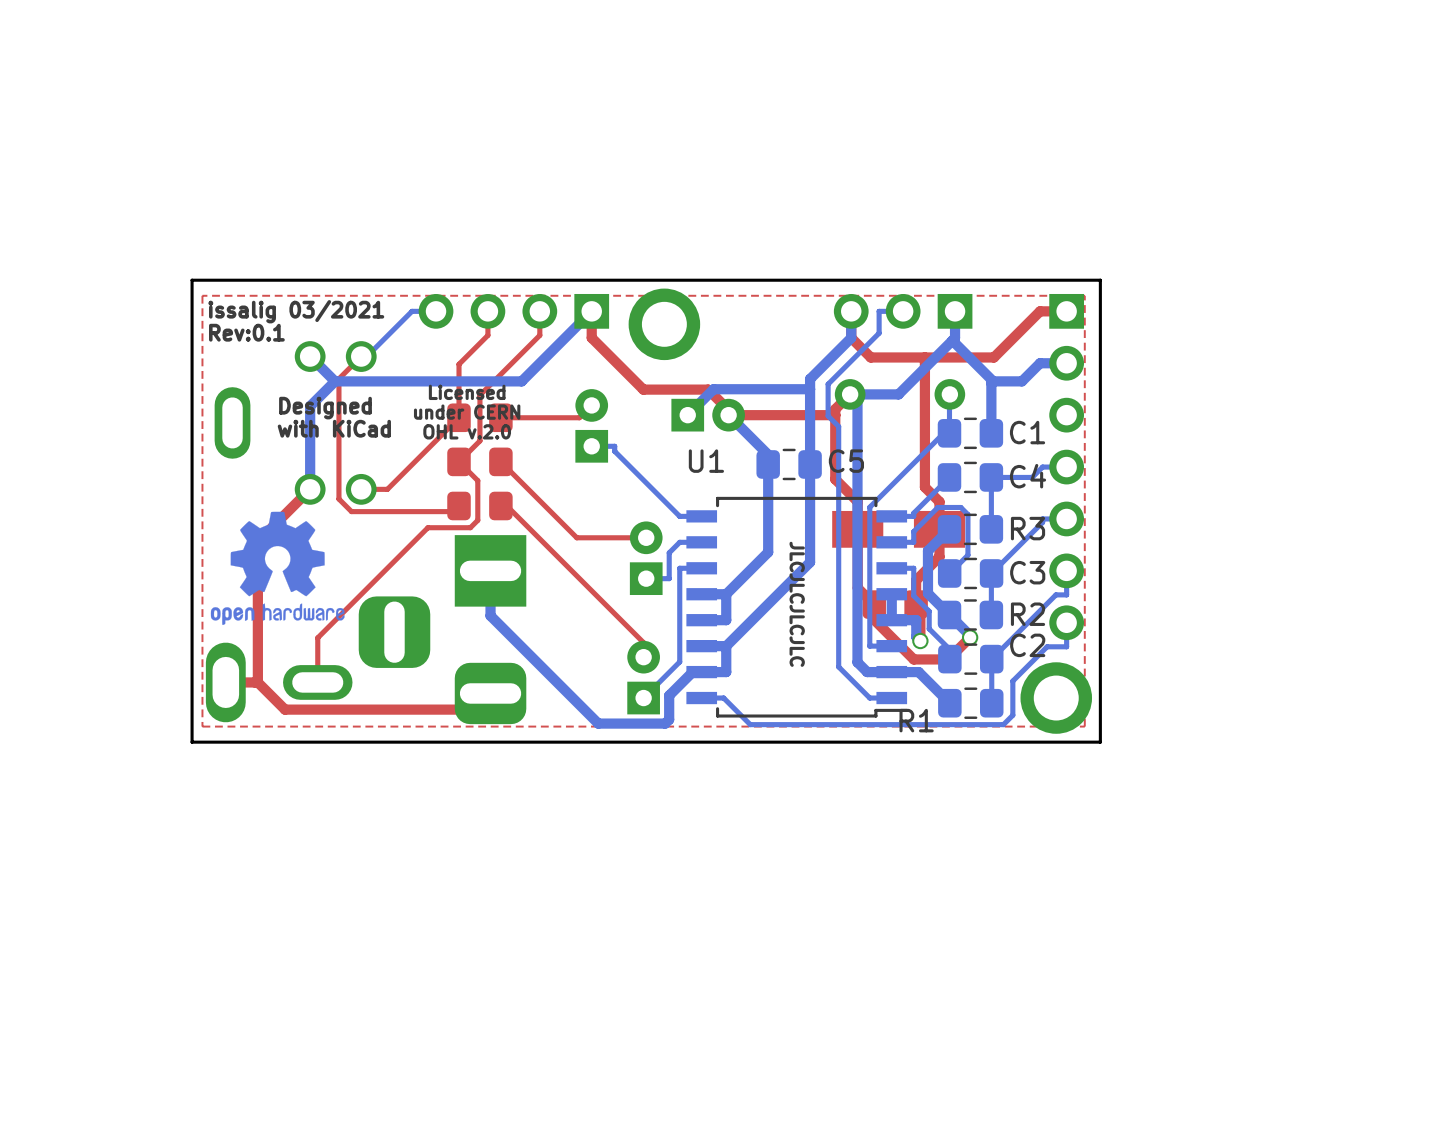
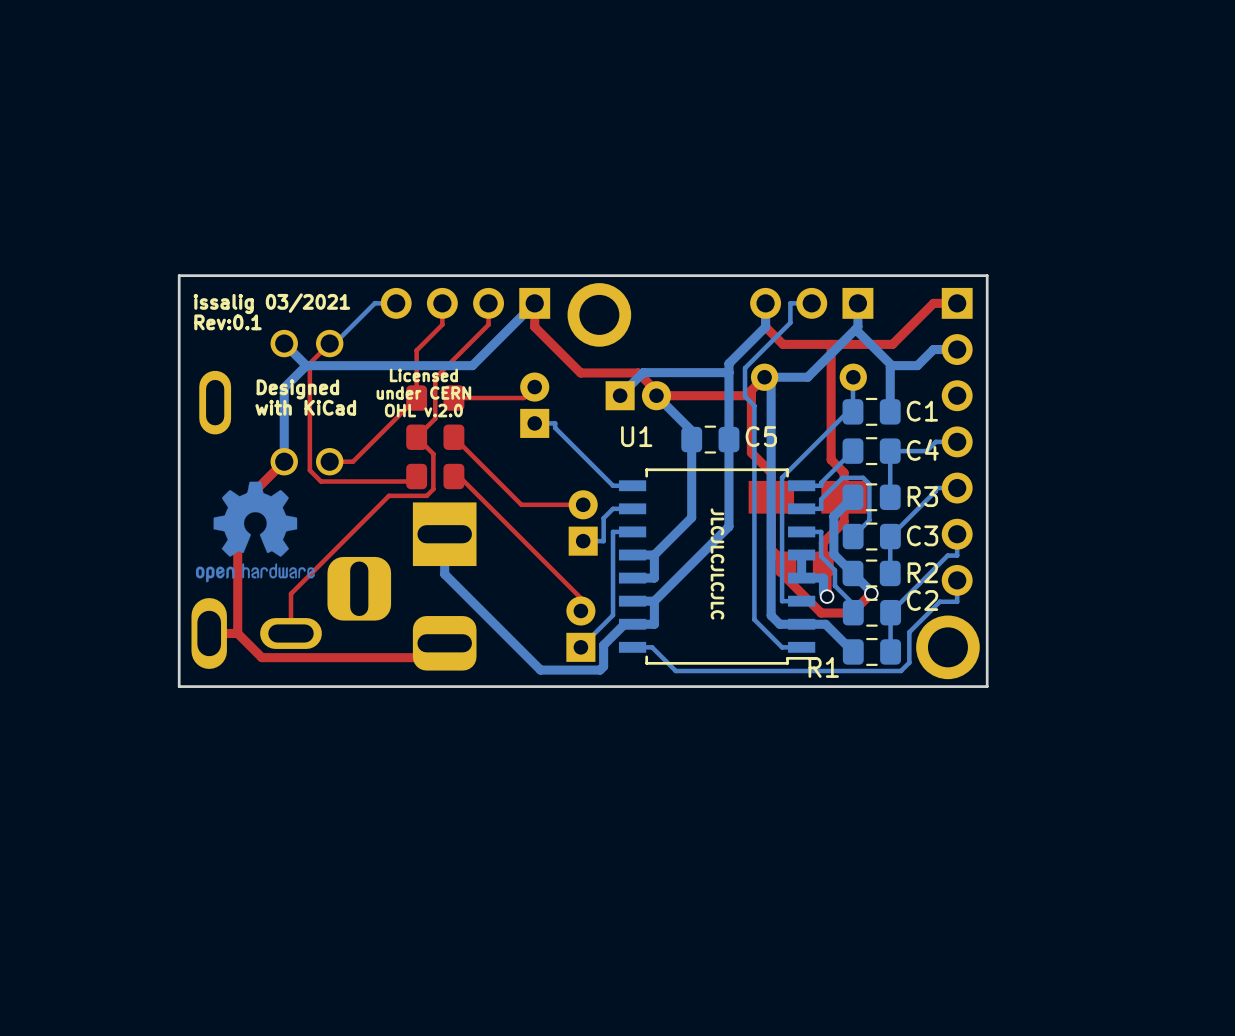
top zone outline: (1084, 295) (1084, 726) (202, 726) (202, 295) (1084, 295) -> none

